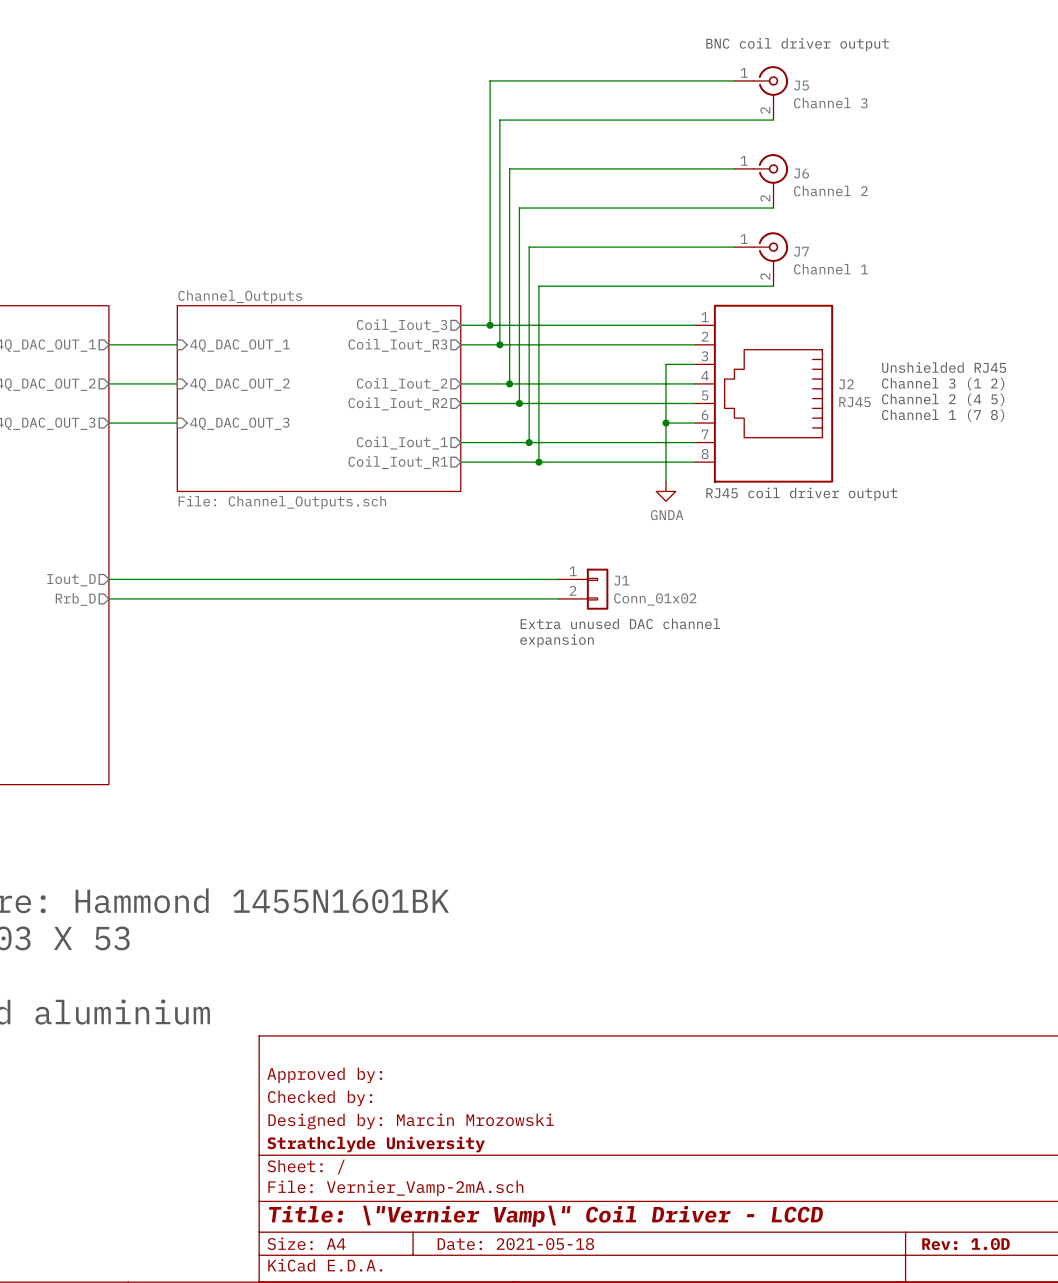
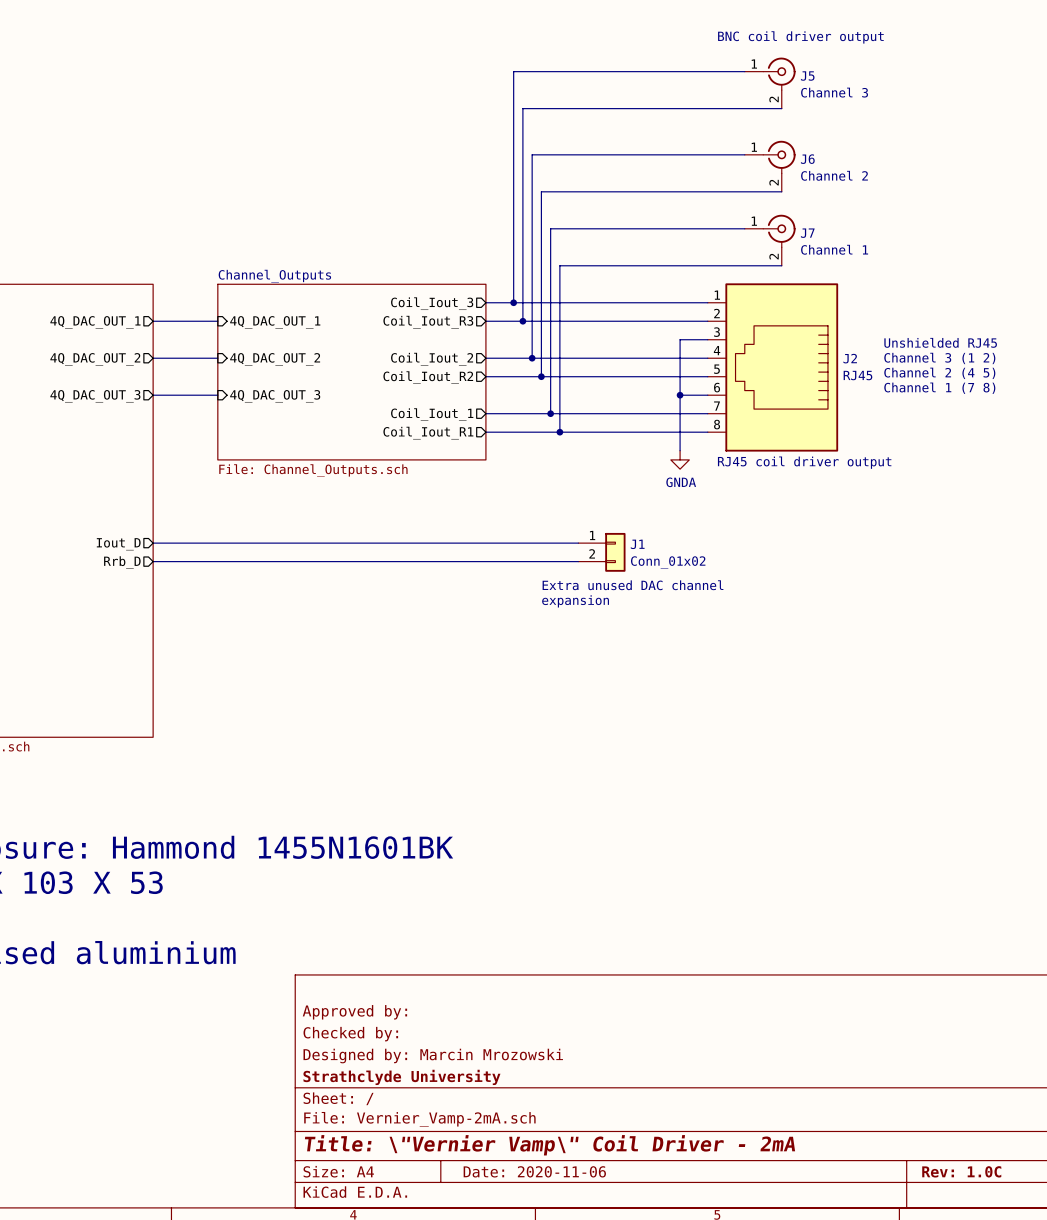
title block: Title: \"Vernier Vamp\" Coil Driver - LCCD (546, 1216) -> Title: \"Vernier Vamp\" Coil Driver - 2mA (549, 1145)
title block: Date: 2021-05-18 (515, 1244) -> Date: 2020-11-06 (534, 1171)
title block: Rev: 1.0D (965, 1244) -> Rev: 1.0C (961, 1171)

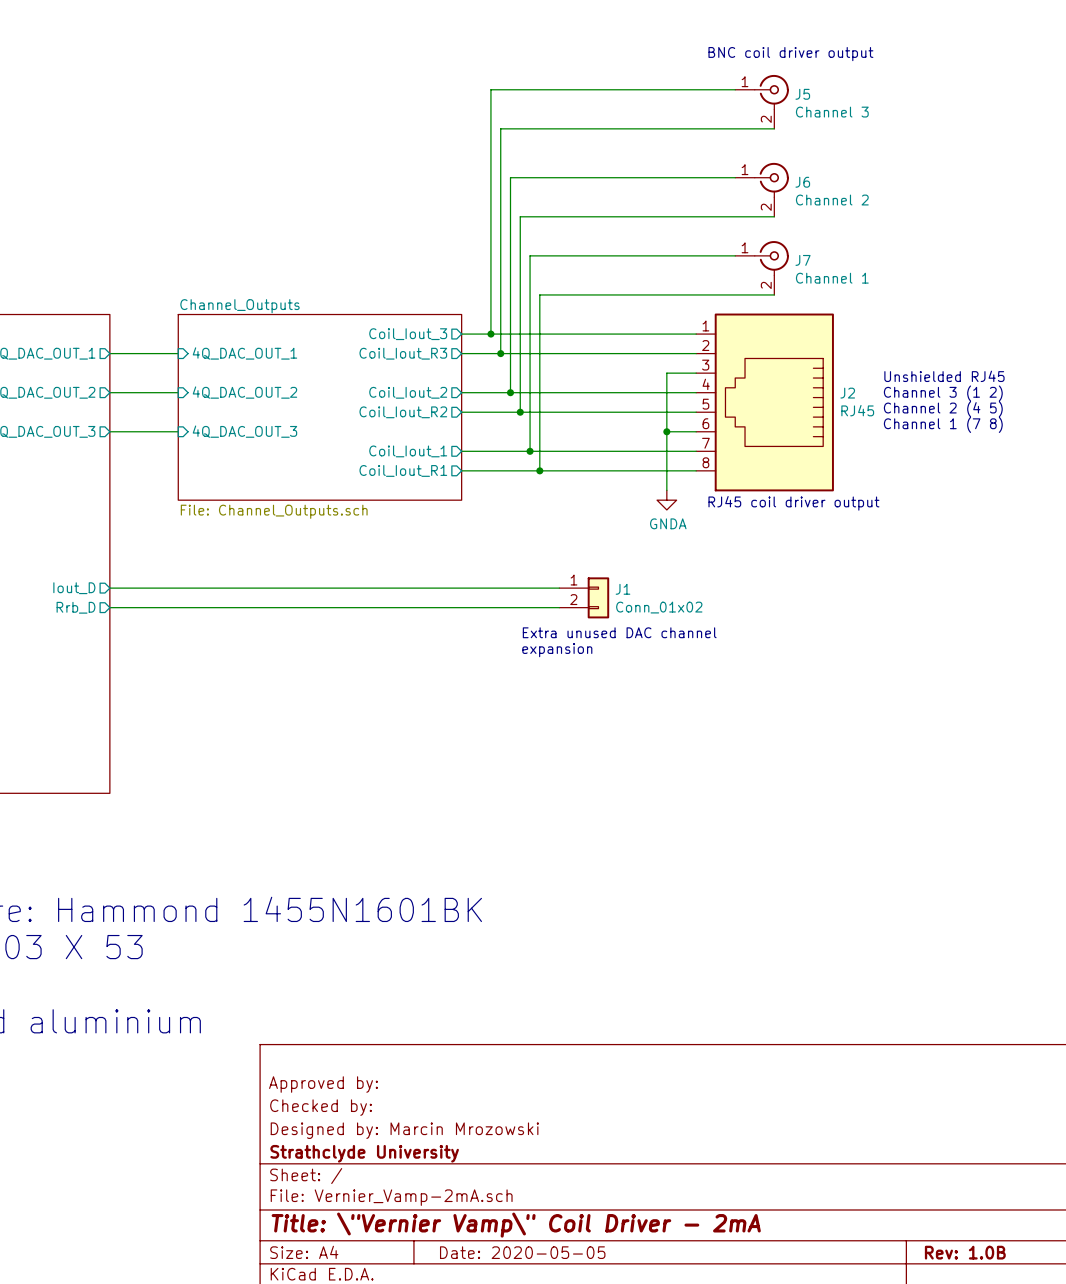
title block: Date: 2020-11-06 (534, 1171) -> Date: 2020-05-05 (522, 1252)
title block: Rev: 1.0C (961, 1171) -> Rev: 1.0B (965, 1252)

